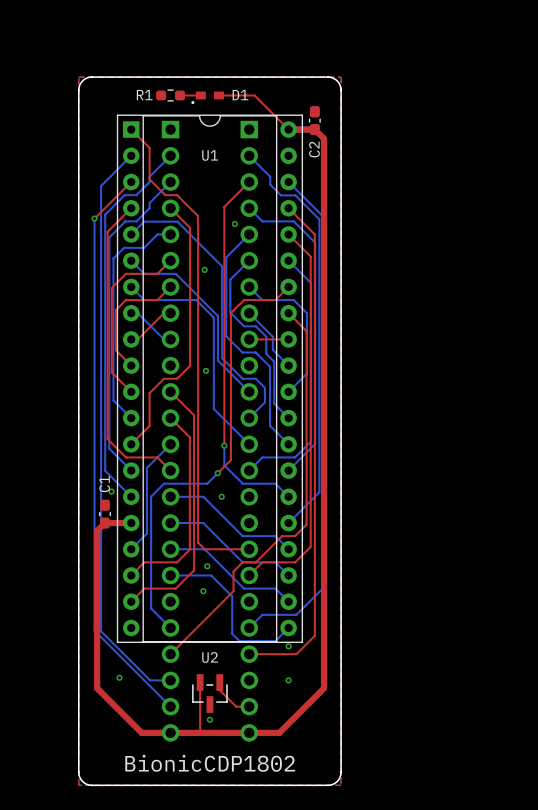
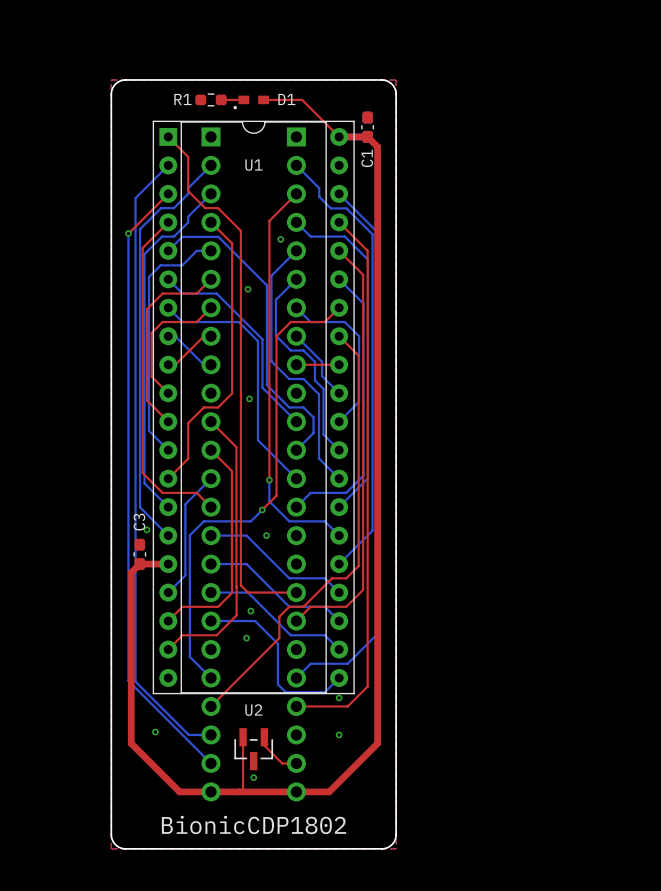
C2 name: C2 (314, 149) -> C1 (367, 158)
C1 name: C1 (104, 484) -> C3 (139, 522)

